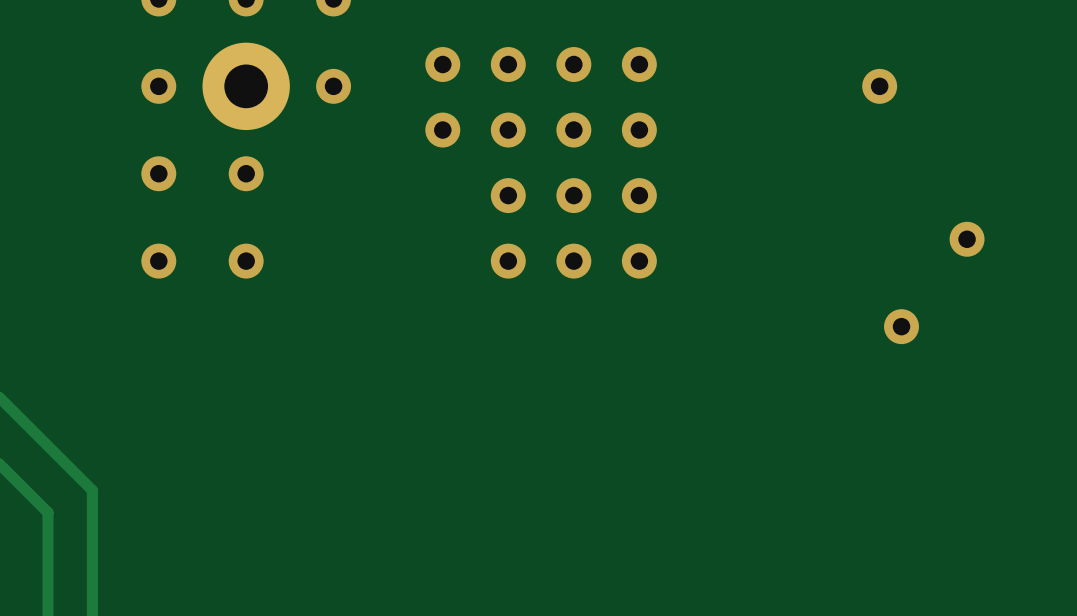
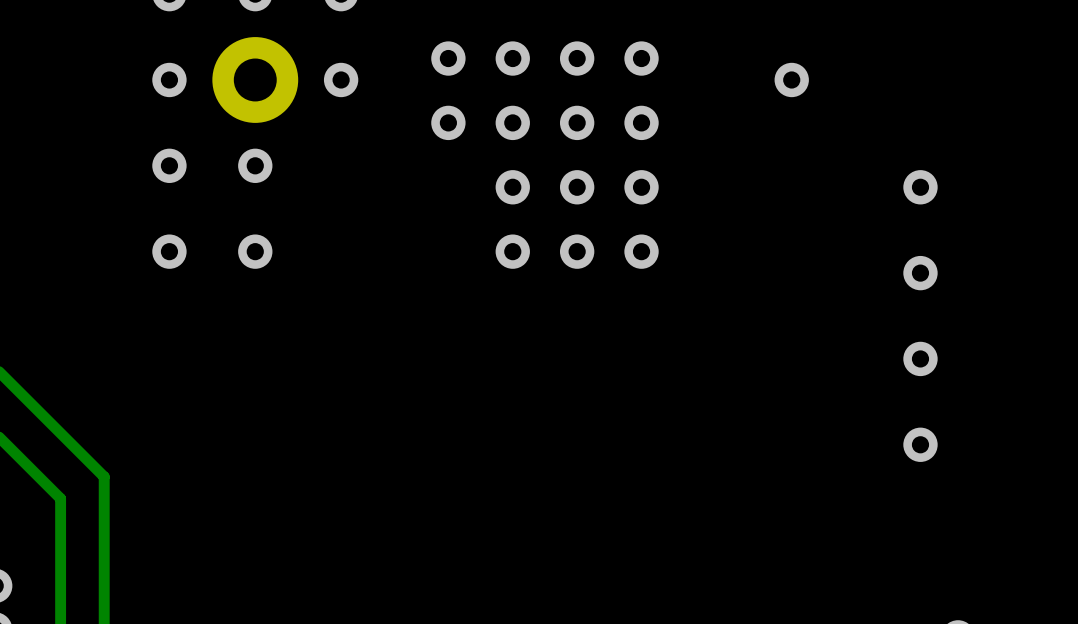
via: none -> (791, 79)
via: (879, 86) -> none
via: none -> (920, 187)
via: (967, 239) -> none
via: none -> (920, 273)
via: (901, 326) -> none
via: none -> (920, 358)
via: none -> (920, 444)

